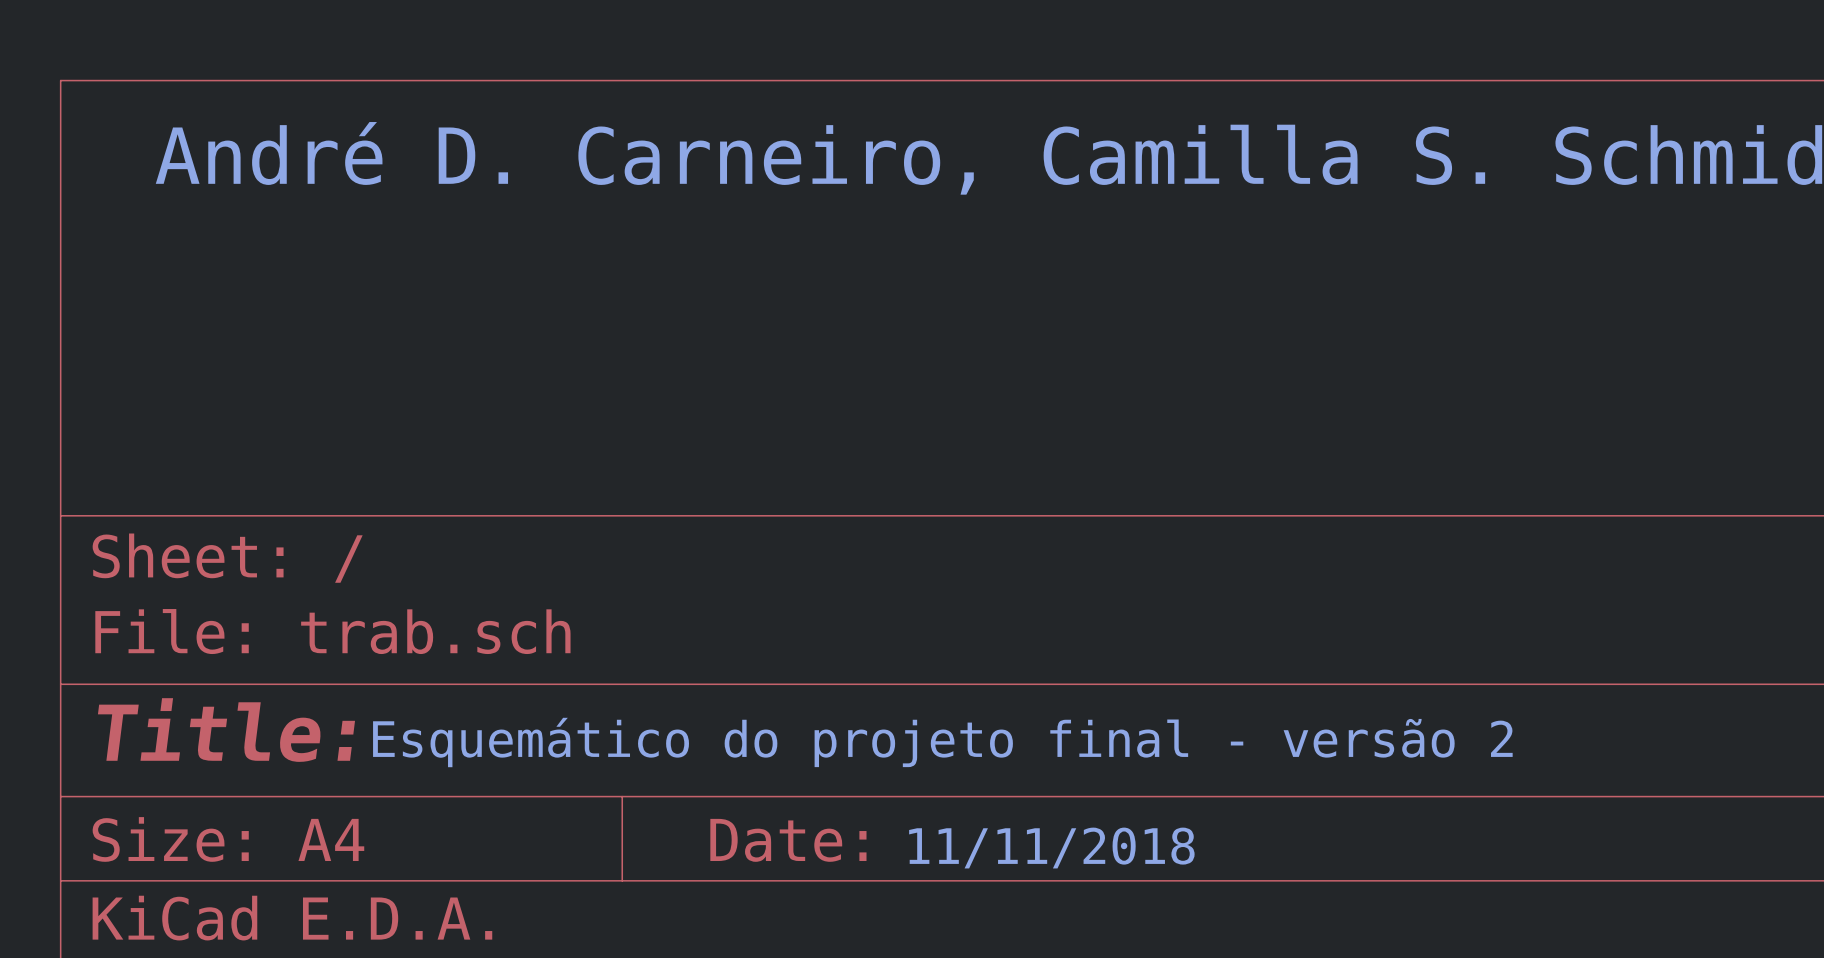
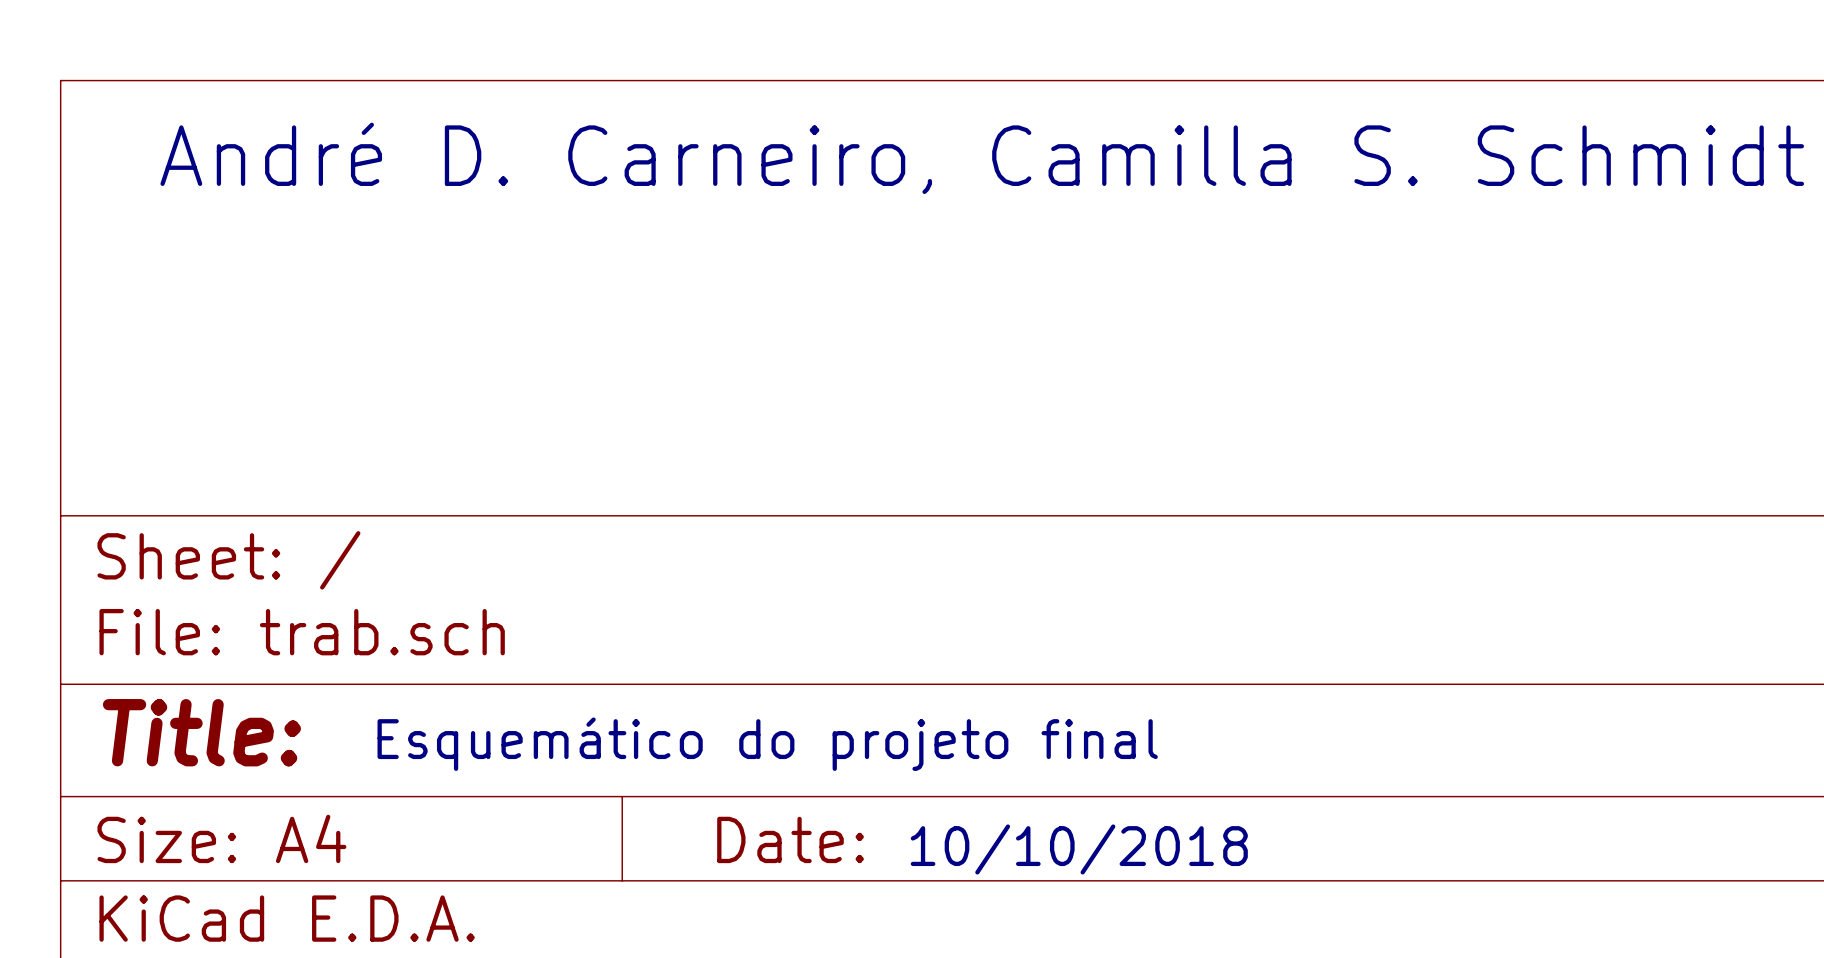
text: Esquemático do projeto final - versão 2 (942, 742) -> Esquemático do projeto final (767, 744)
text: 11/11/2018 (1051, 848) -> 10/10/2018 (1079, 849)

